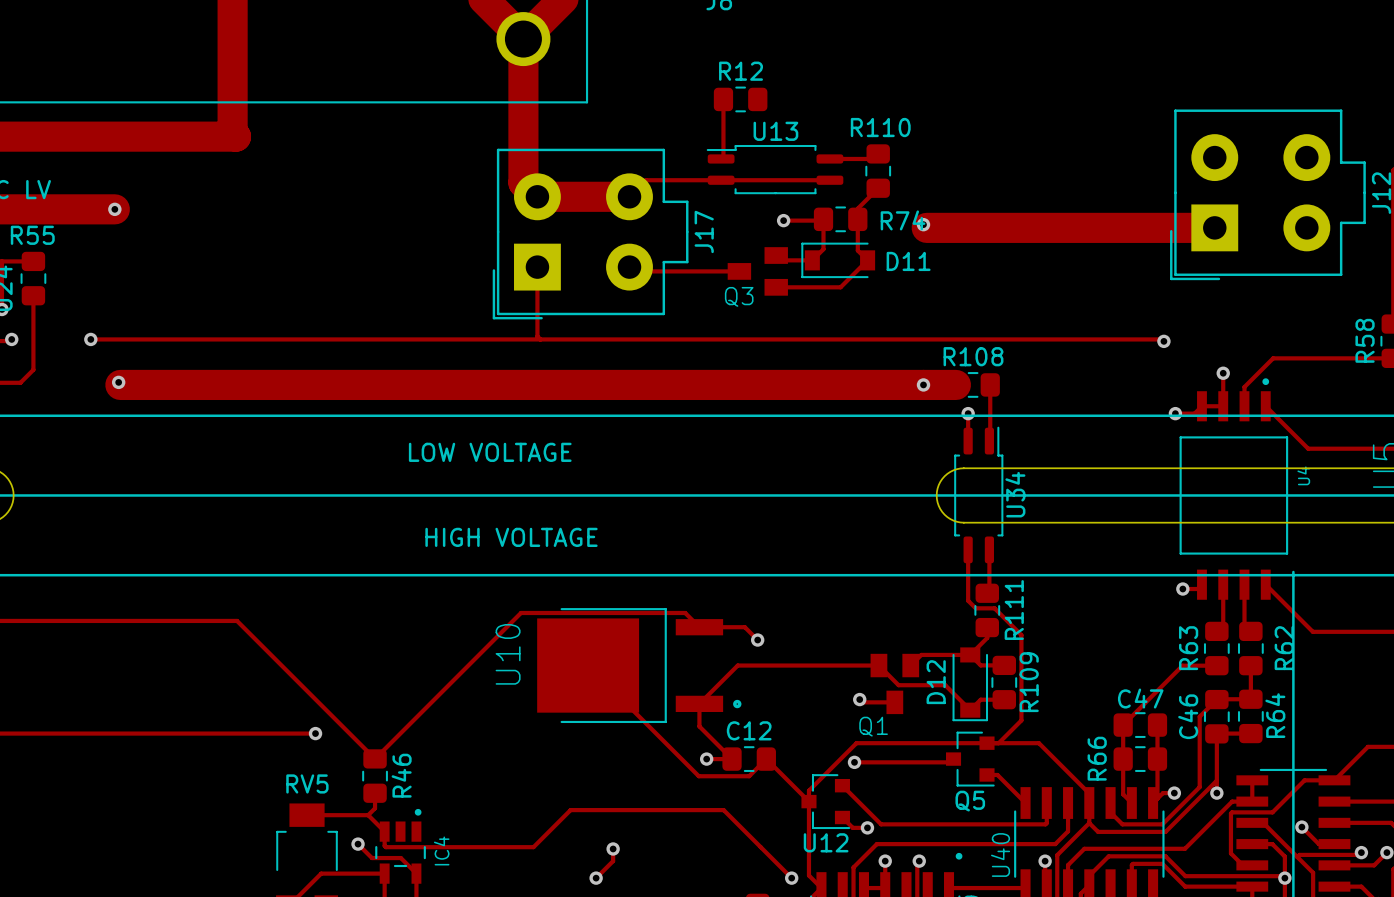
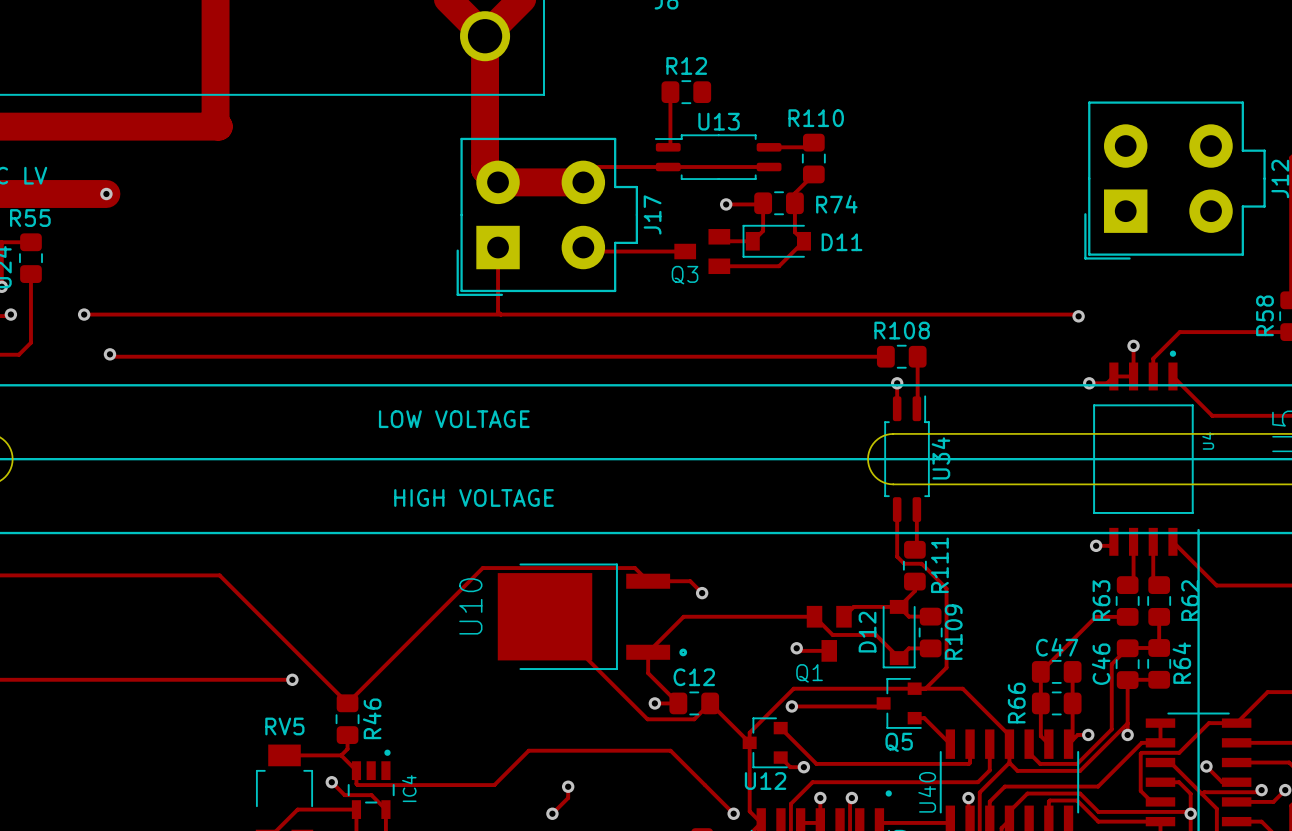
track: (923, 224) (926, 227) (1214, 227) -> none
via: (923, 224) -> none
track width: thick (120, 384) (955, 384) -> thin (111, 356) (885, 356)
via: (923, 384) -> none

